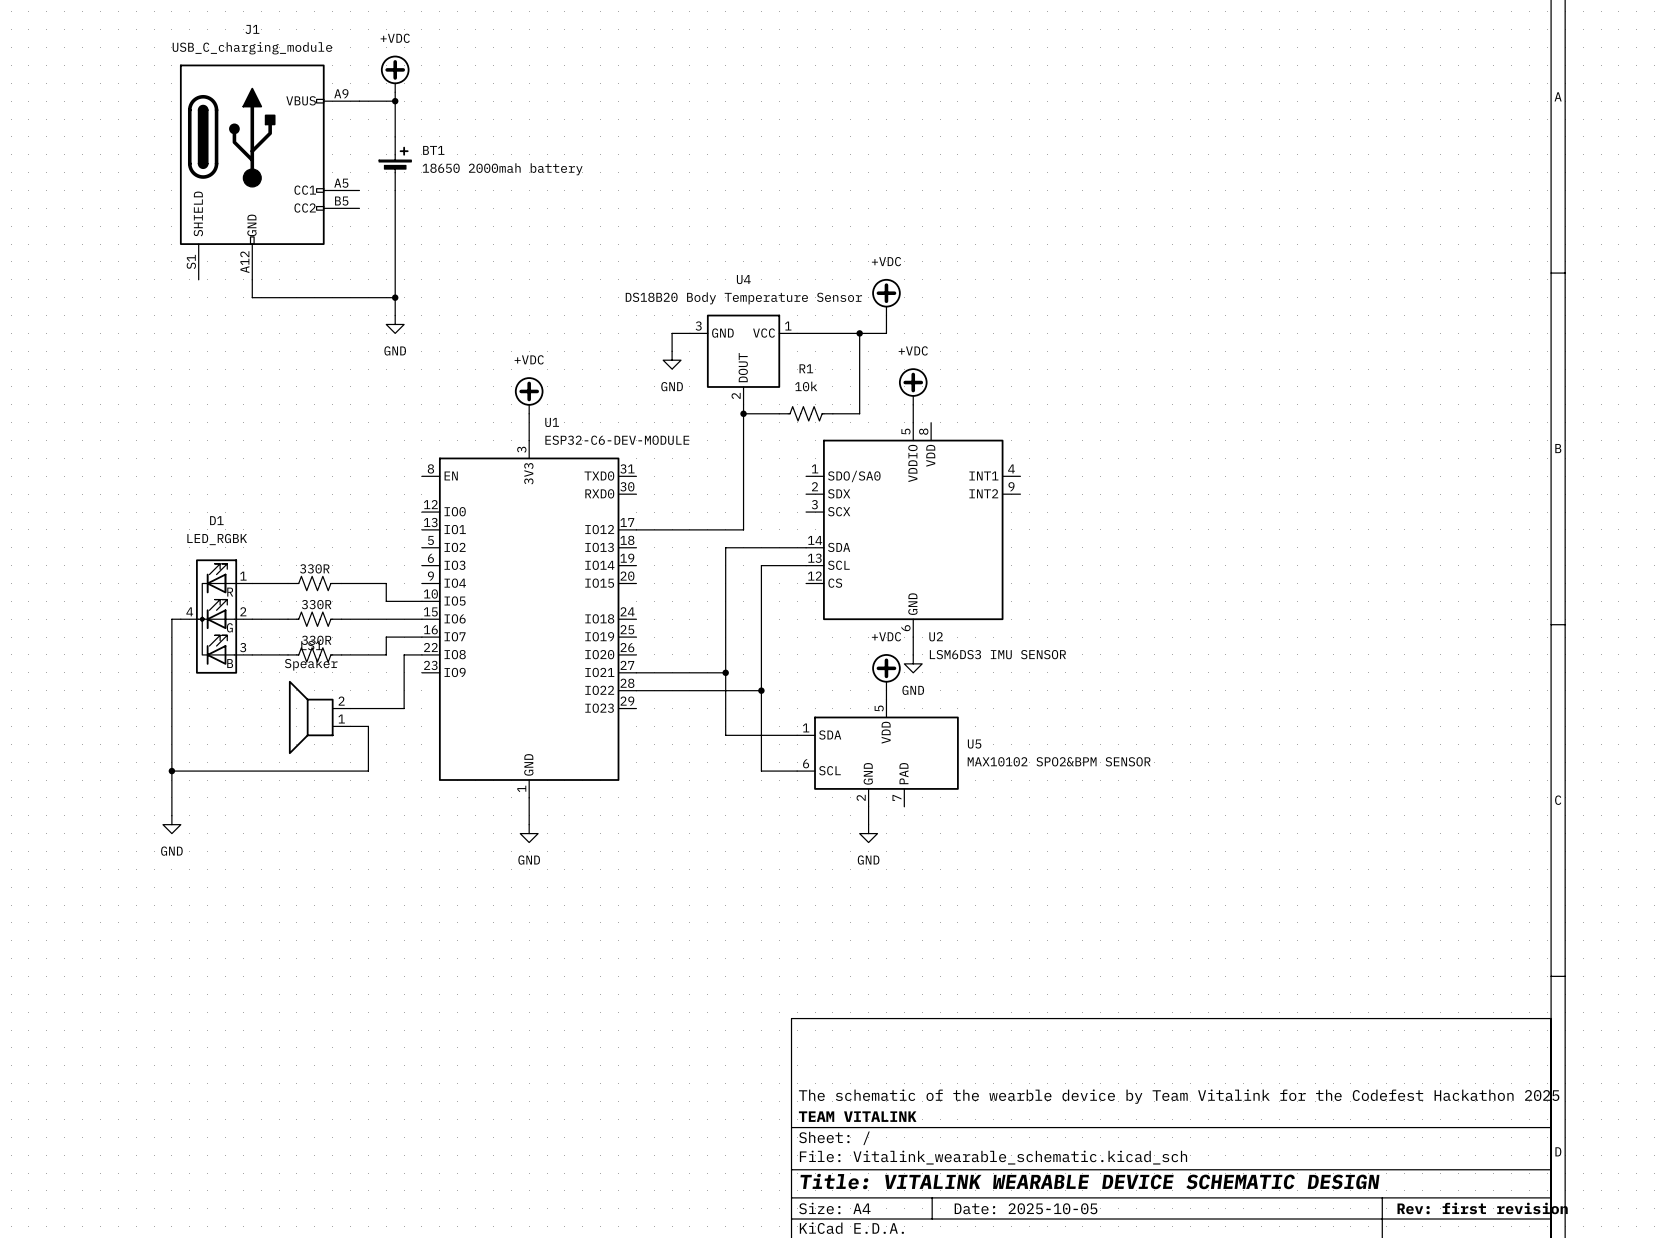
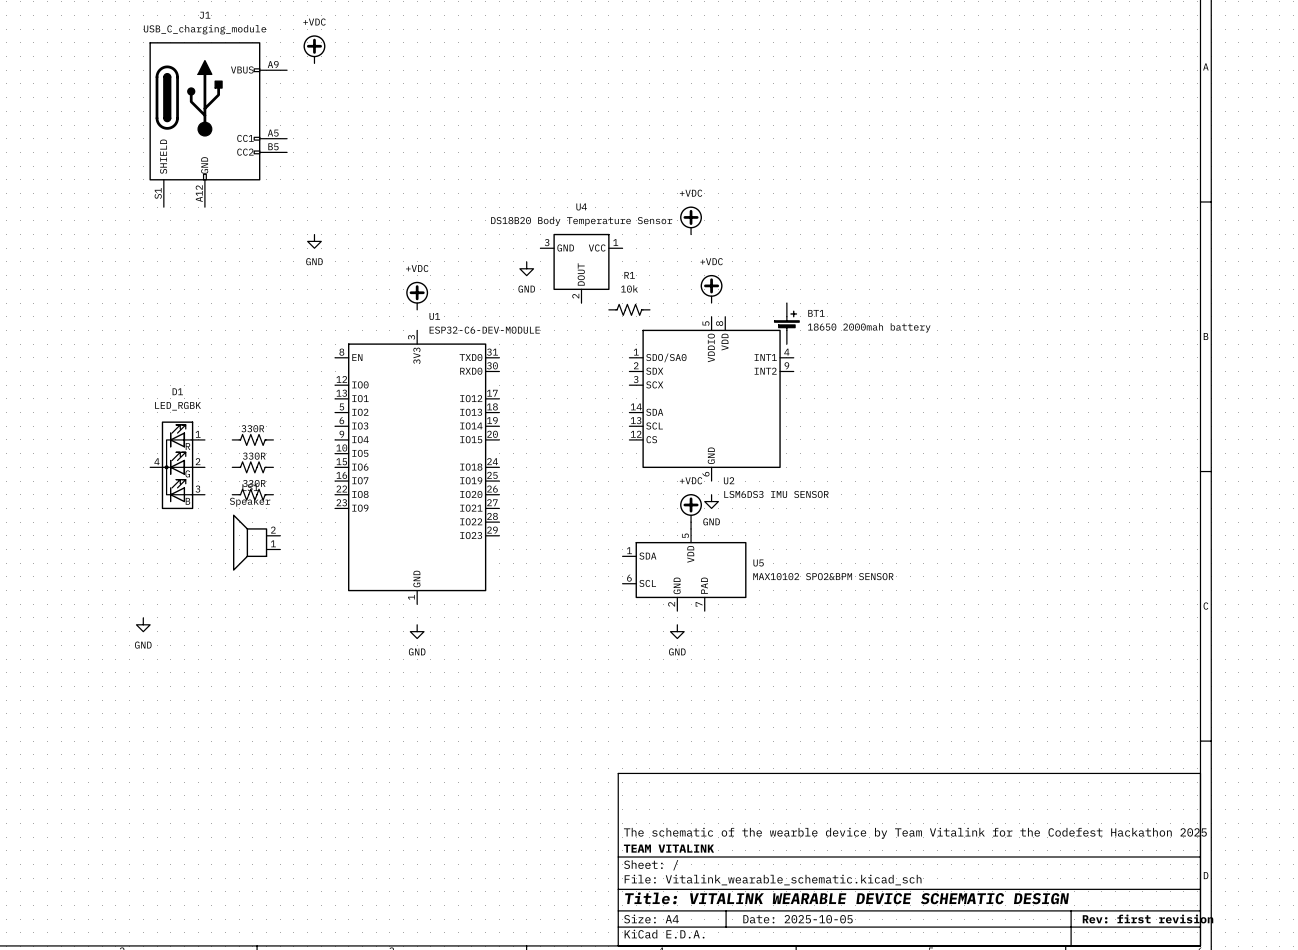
wire: (395, 92) (395, 136) -> none
wire: (359, 101) (395, 101) -> none
junction: (395, 101) -> none
BT1 position: (395, 163) -> (786, 323)
wire: (395, 190) (395, 315) -> none
wire: (252, 279) (252, 297) (395, 297) -> none
junction: (395, 297) -> none
wire: (886, 315) (886, 333) (797, 333) -> none
wire: (689, 333) (672, 333) (672, 351) -> none
wire: (859, 333) (859, 413) (832, 413) -> none
junction: (859, 333) -> none
wire: (743, 404) (743, 529) (636, 529) -> none
wire: (913, 404) (913, 422) -> none
wire: (529, 413) (529, 440) -> none
wire: (743, 413) (779, 413) -> none
junction: (743, 413) -> none
wire: (806, 547) (725, 547) (725, 735) (797, 735) -> none
wire: (806, 565) (761, 565) (761, 771) (797, 771) -> none
wire: (252, 583) (288, 583) -> none
wire: (341, 583) (386, 583) (386, 601) (421, 601) -> none
wire: (180, 619) (171, 619) (171, 815) -> none
wire: (252, 619) (288, 619) -> none
wire: (341, 619) (421, 619) -> none
wire: (421, 637) (386, 637) (386, 654) (341, 654) -> none
wire: (913, 637) (913, 654) -> none
wire: (252, 654) (288, 654) -> none
wire: (421, 654) (404, 654) (404, 708) (350, 708) -> none
wire: (636, 672) (725, 672) -> none
junction: (725, 672) -> none
wire: (636, 690) (761, 690) -> none
junction: (761, 690) -> none
wire: (350, 726) (368, 726) (368, 771) (171, 771) -> none
junction: (171, 771) -> none
wire: (529, 797) (529, 824) -> none
wire: (868, 806) (868, 824) -> none

